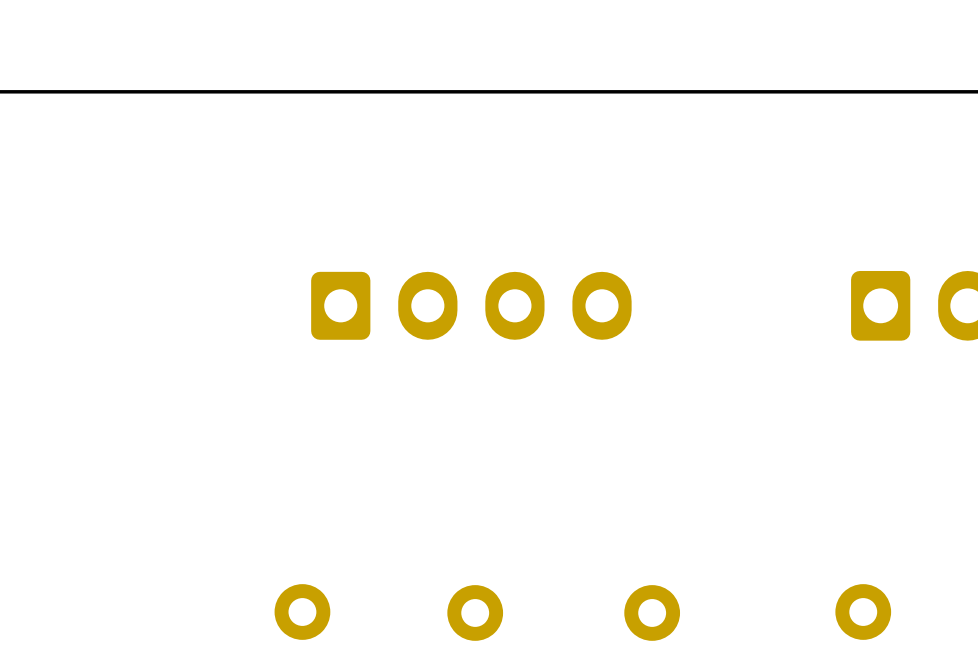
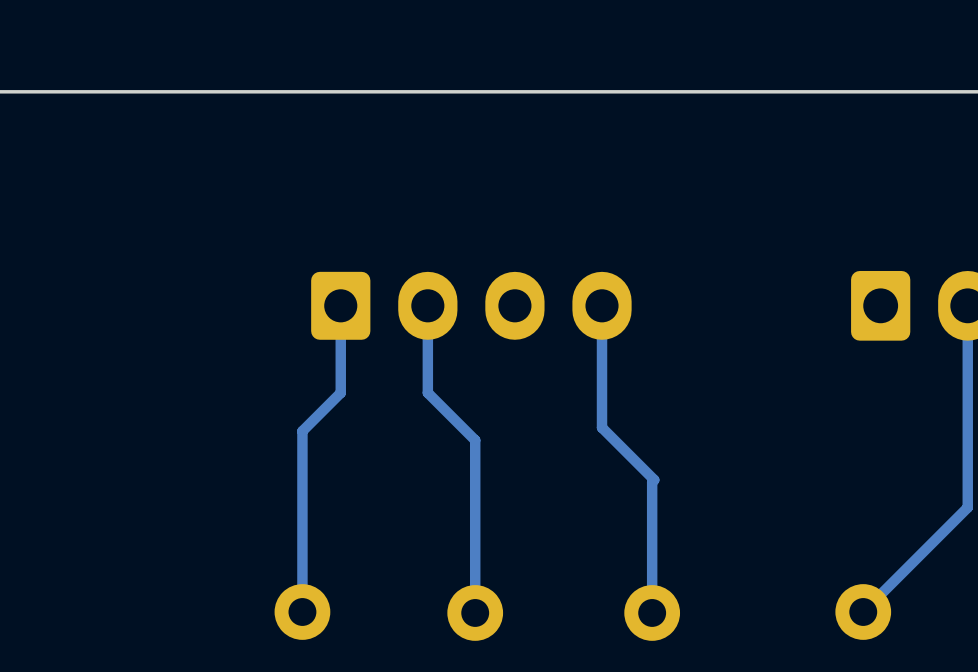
track: none -> (340, 305) (340, 392) (302, 431) (302, 612)
track: none -> (427, 305) (427, 392) (475, 440) (475, 612)
track: none -> (602, 305) (602, 427) (654, 479) (652, 482) (652, 612)
track: none -> (967, 305) (967, 507) (863, 612)

